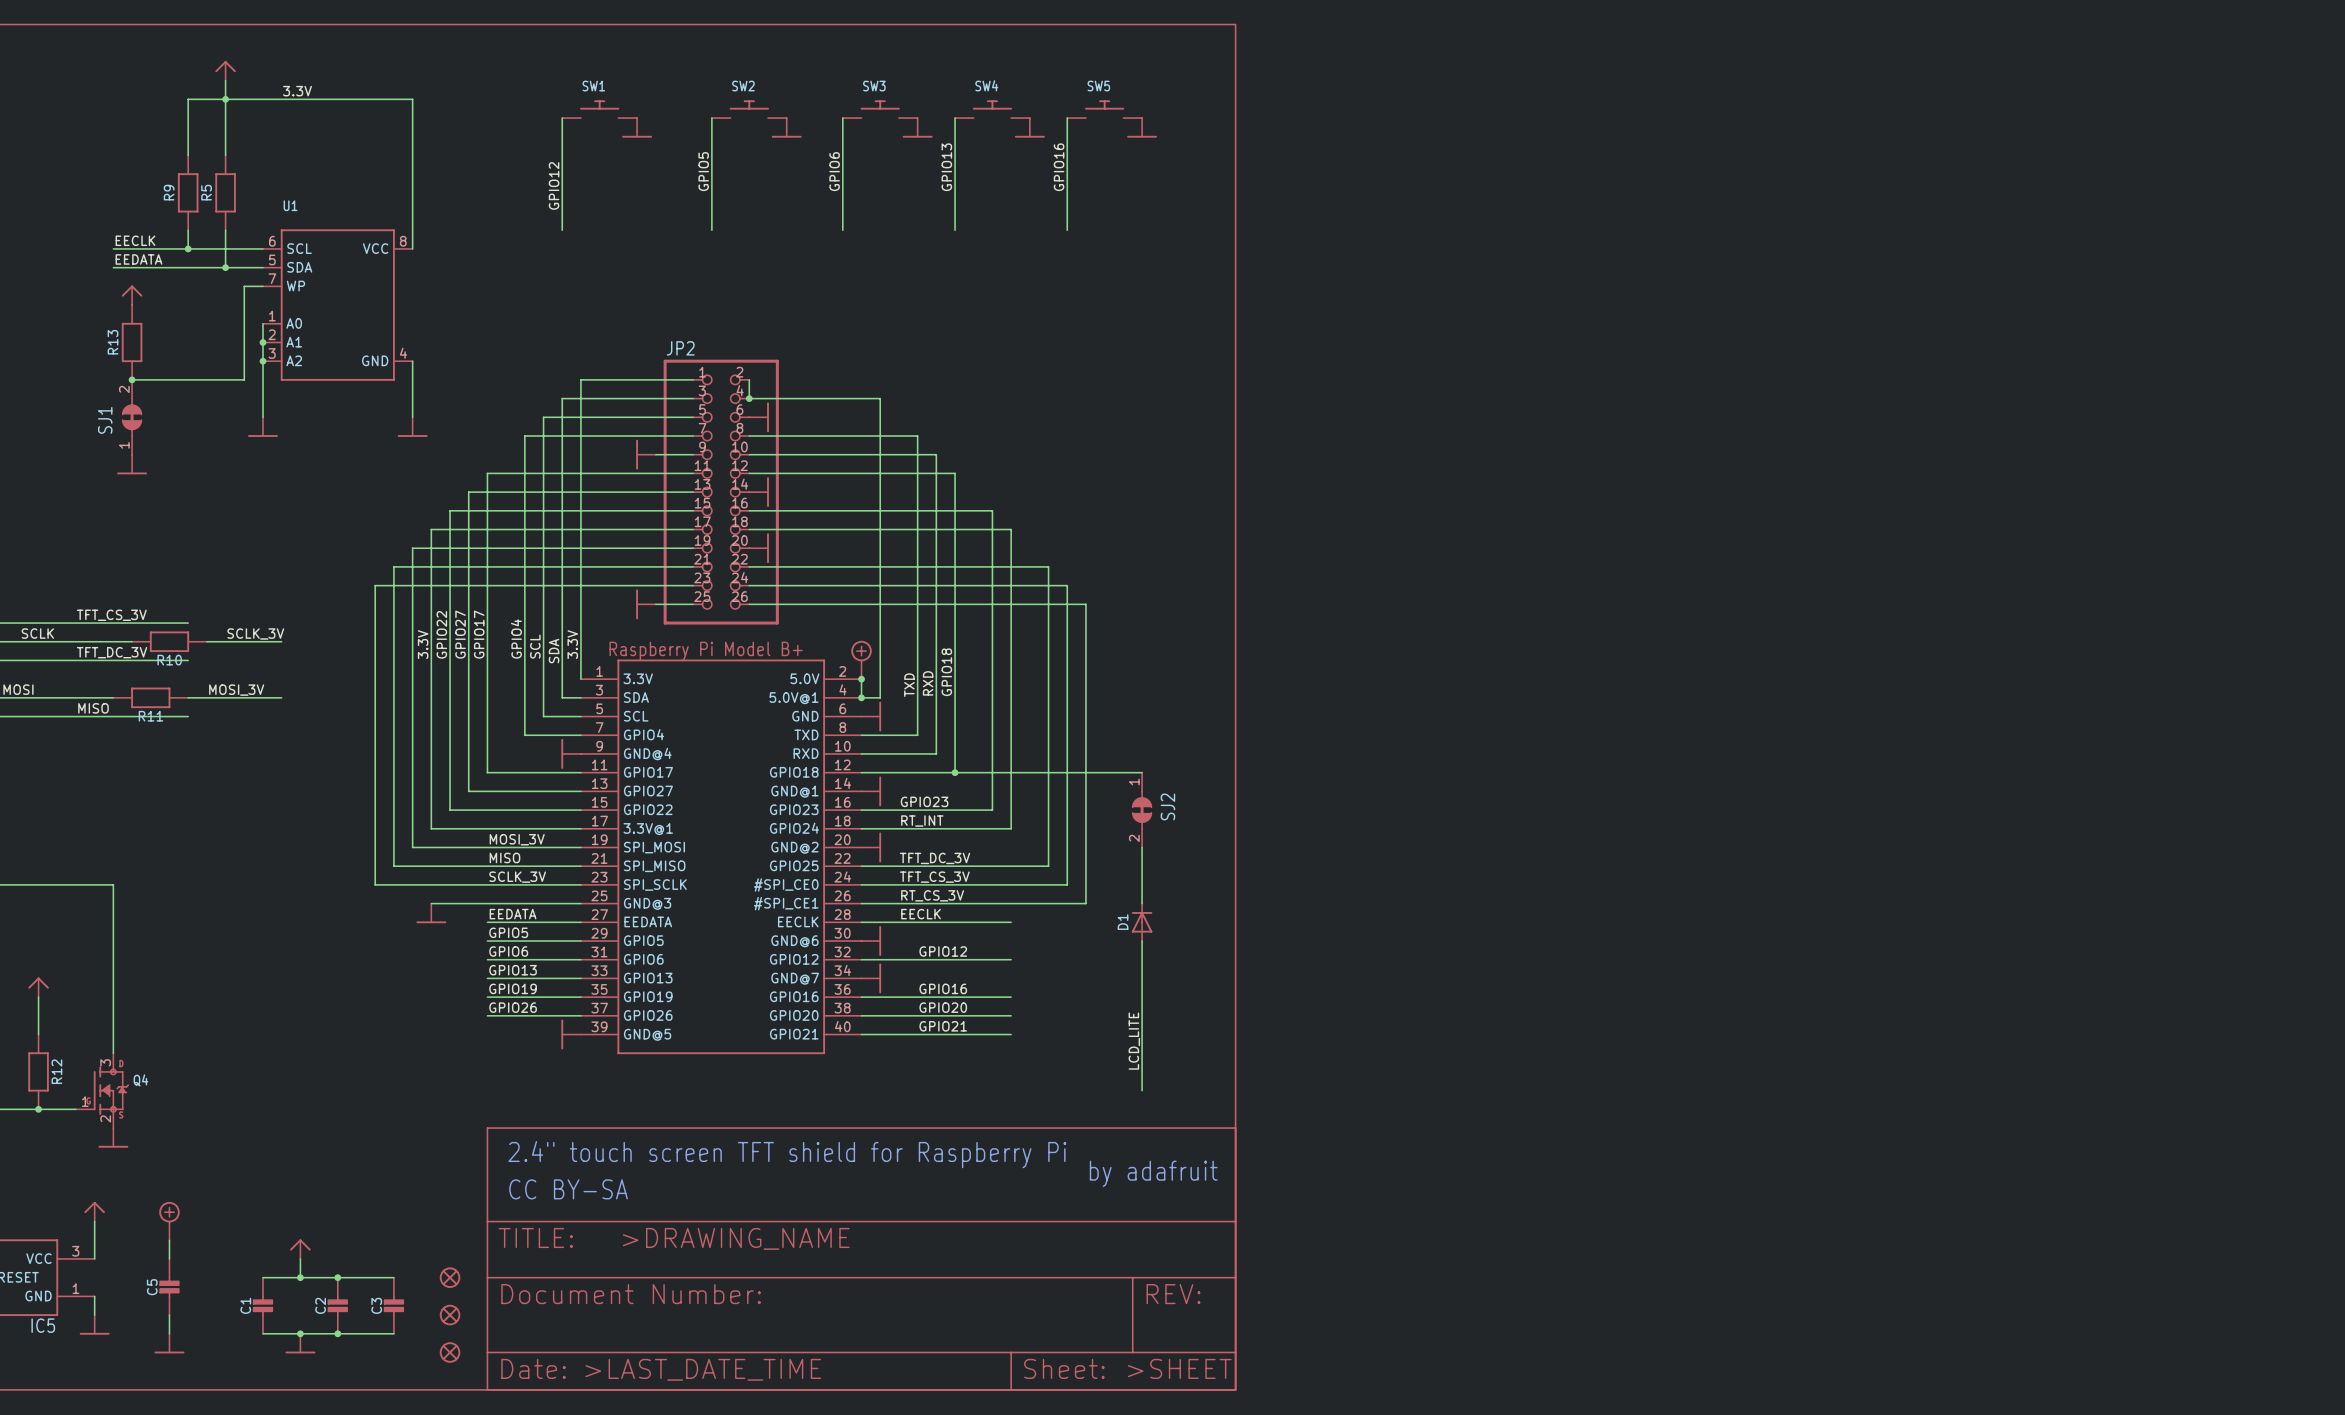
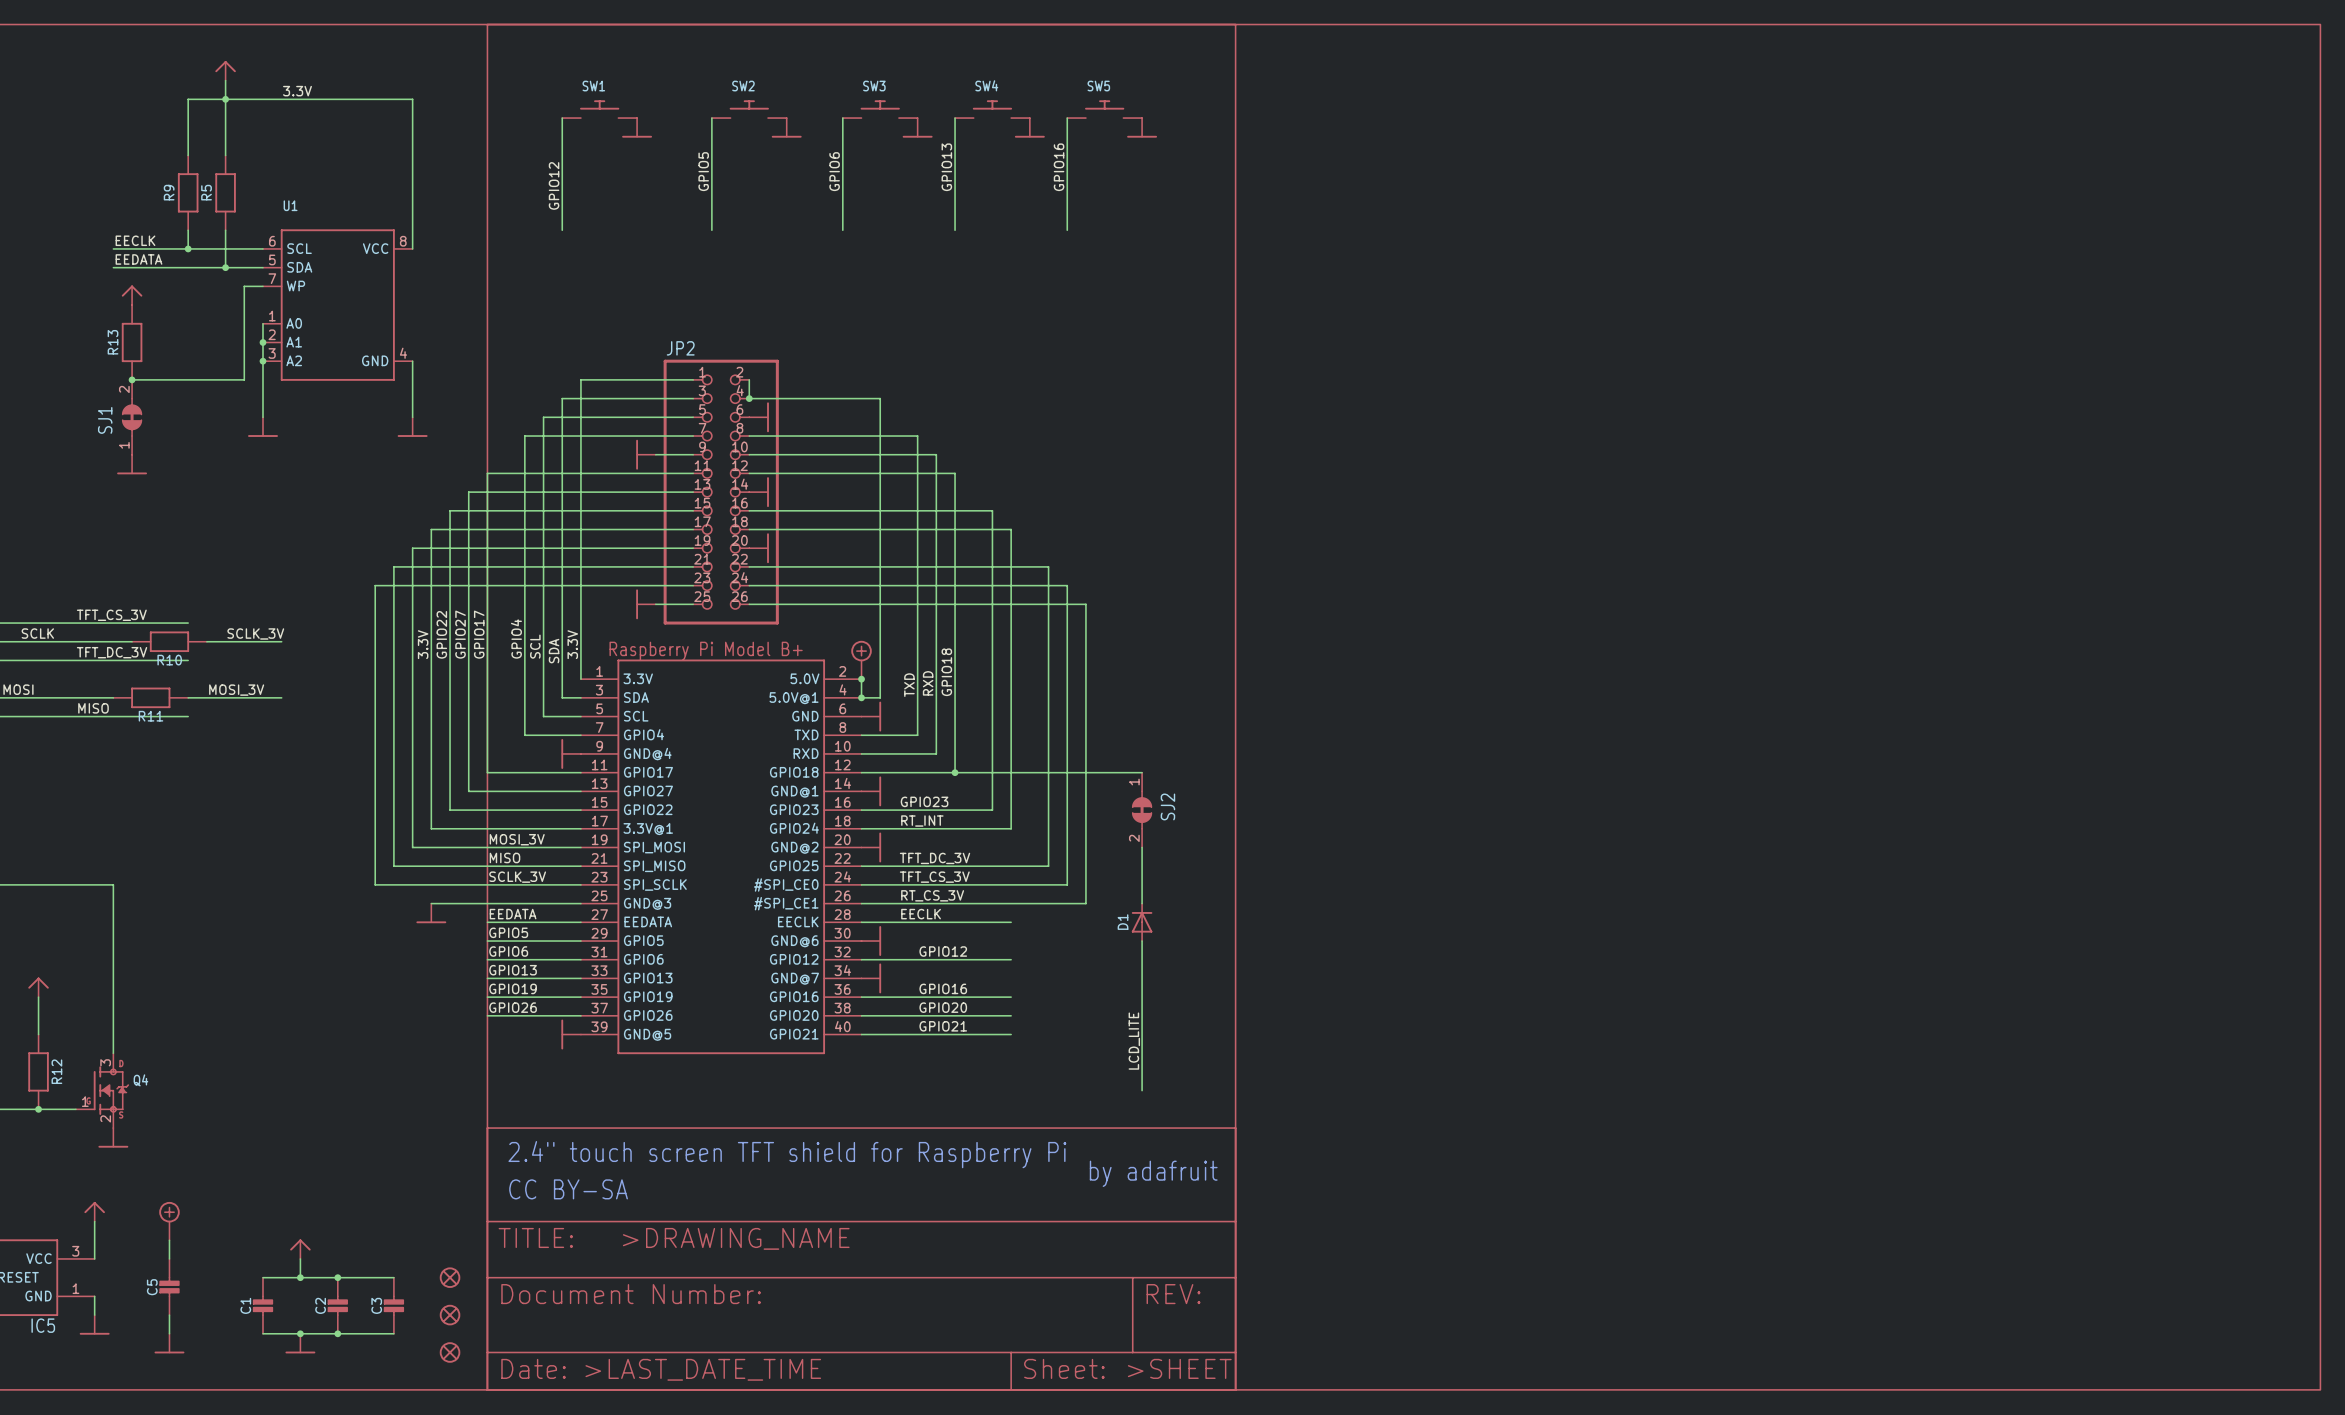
power symbol: none -> (1403, 707)
power symbol: (861, 1258) -> none

